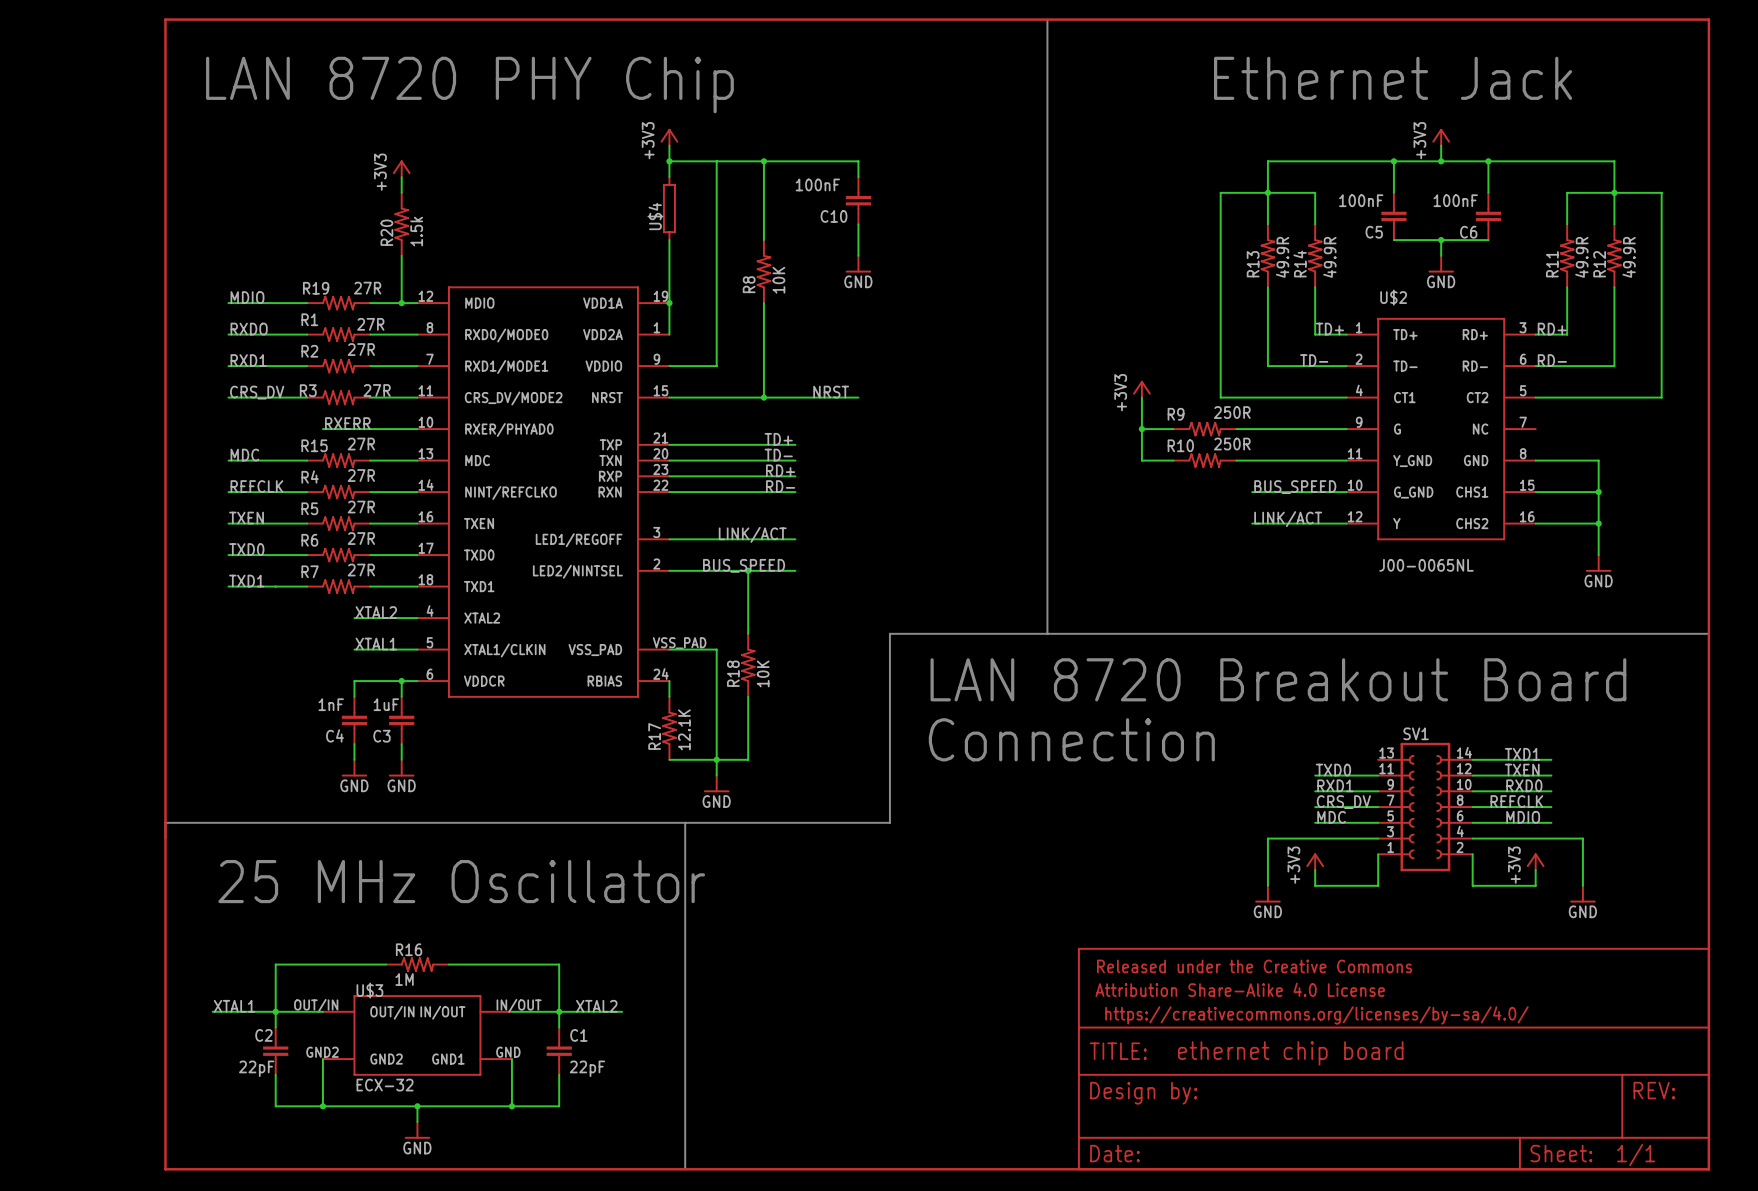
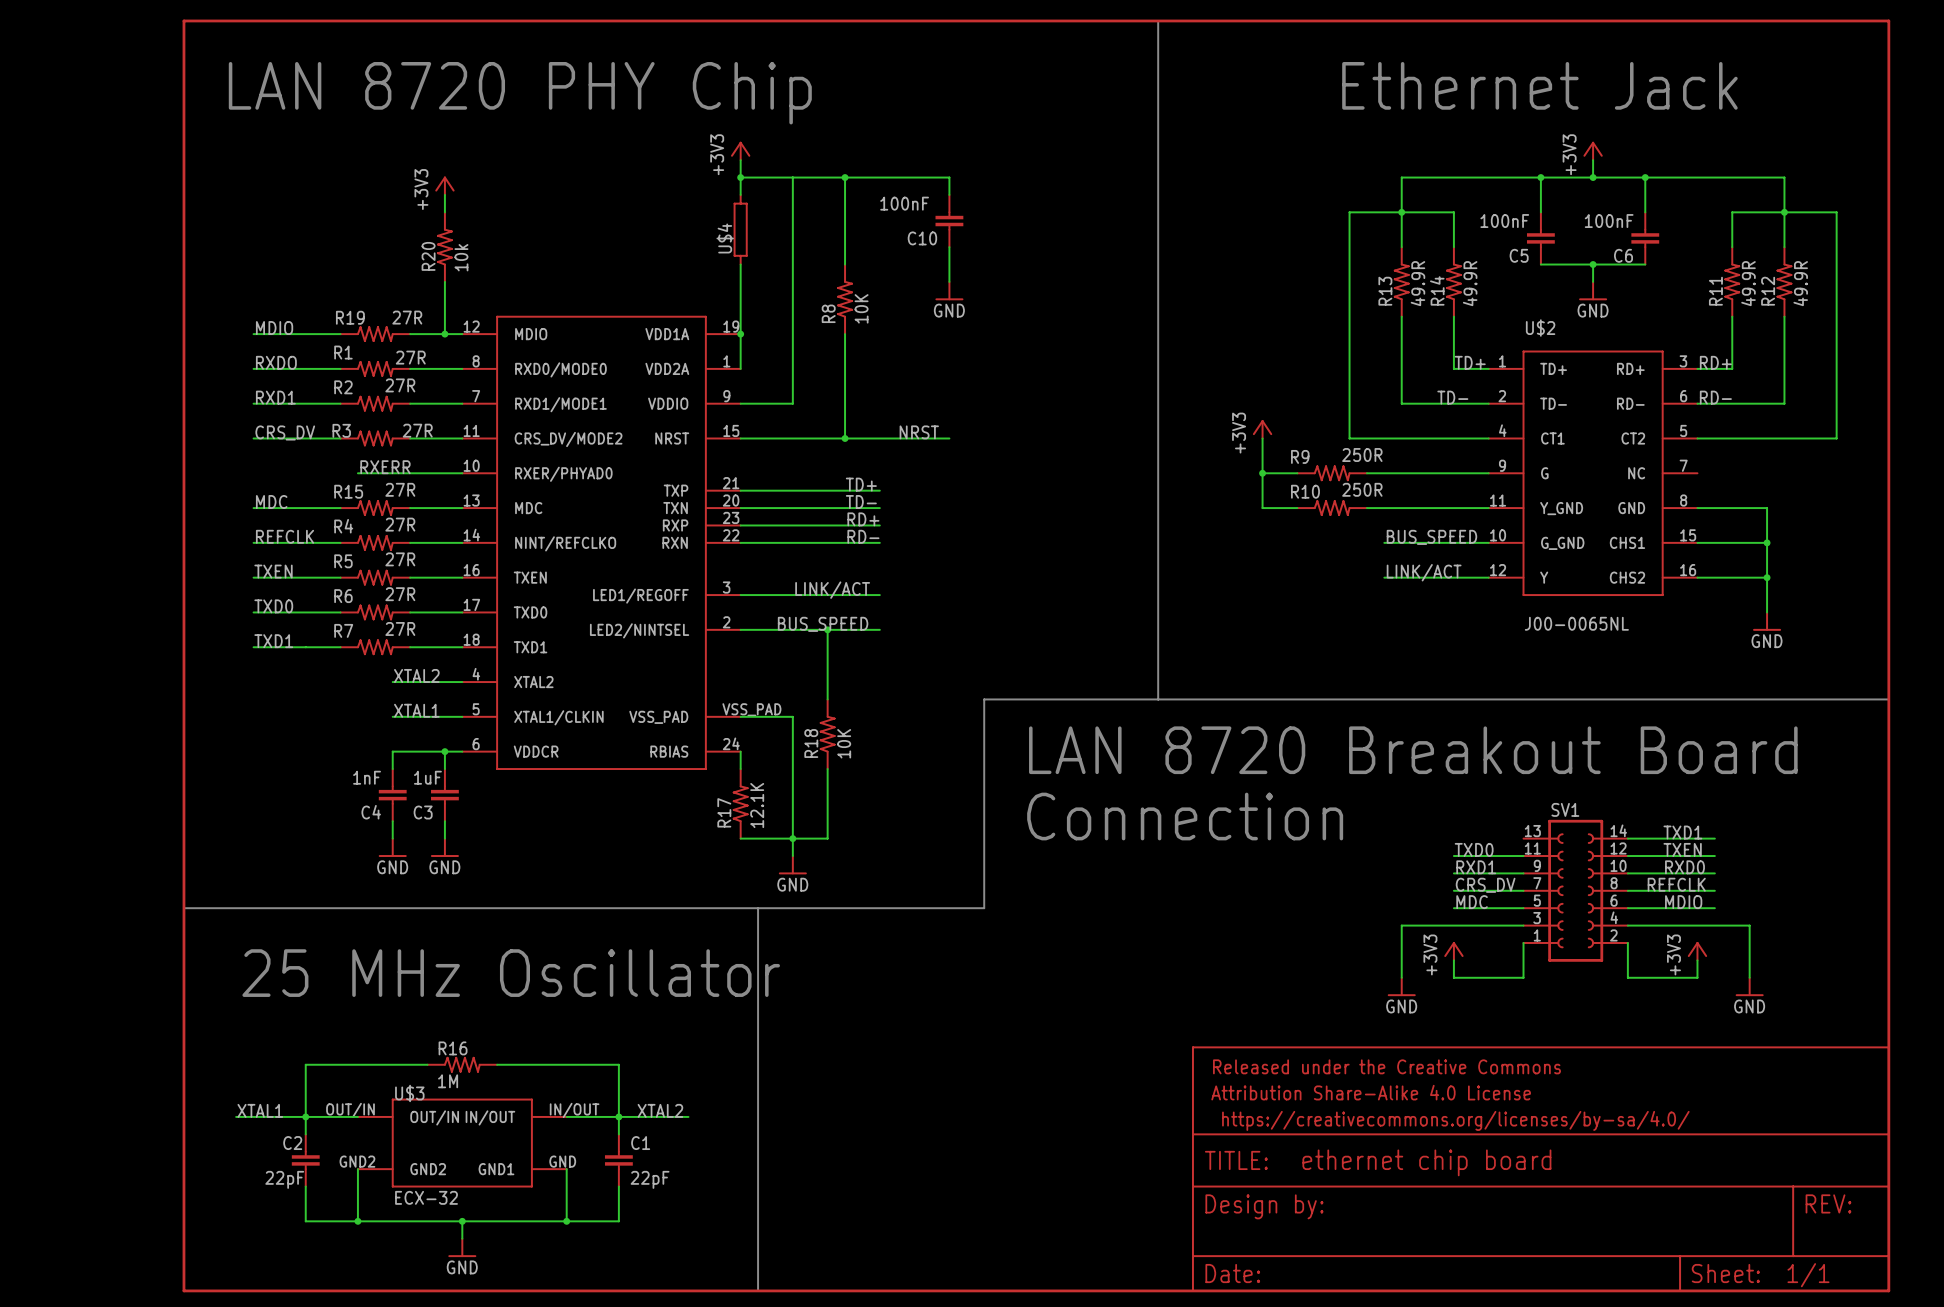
R20 value: 1.5k (416, 231) -> 10k (461, 257)

